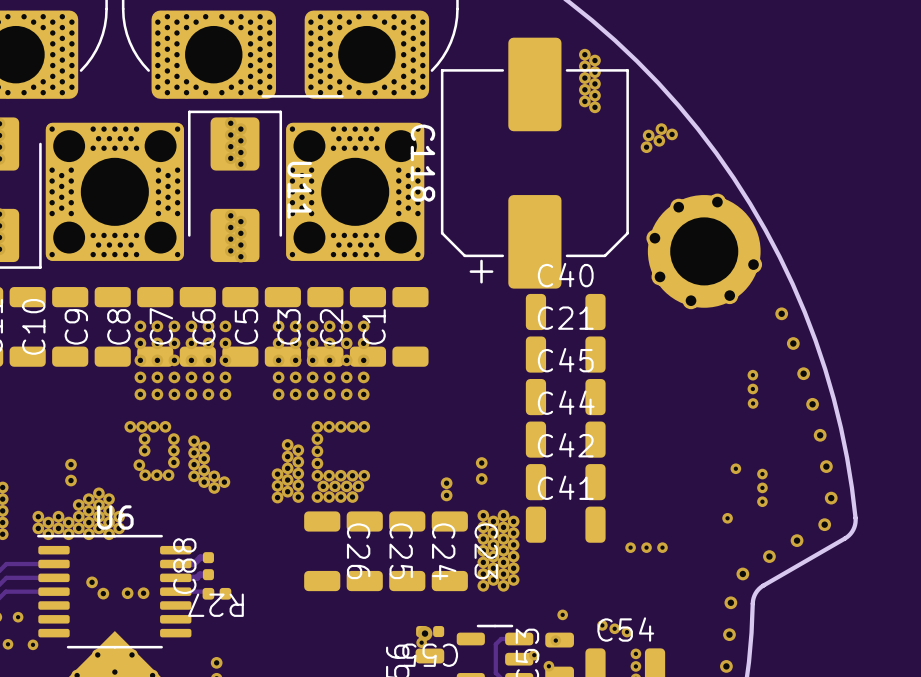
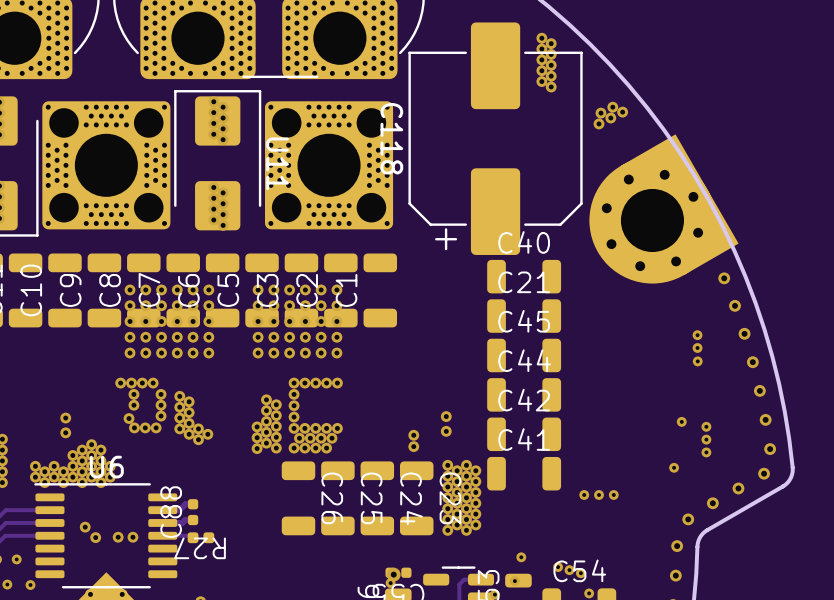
part footprint: [646, 193, 763, 310] -> [589, 134, 739, 284]

